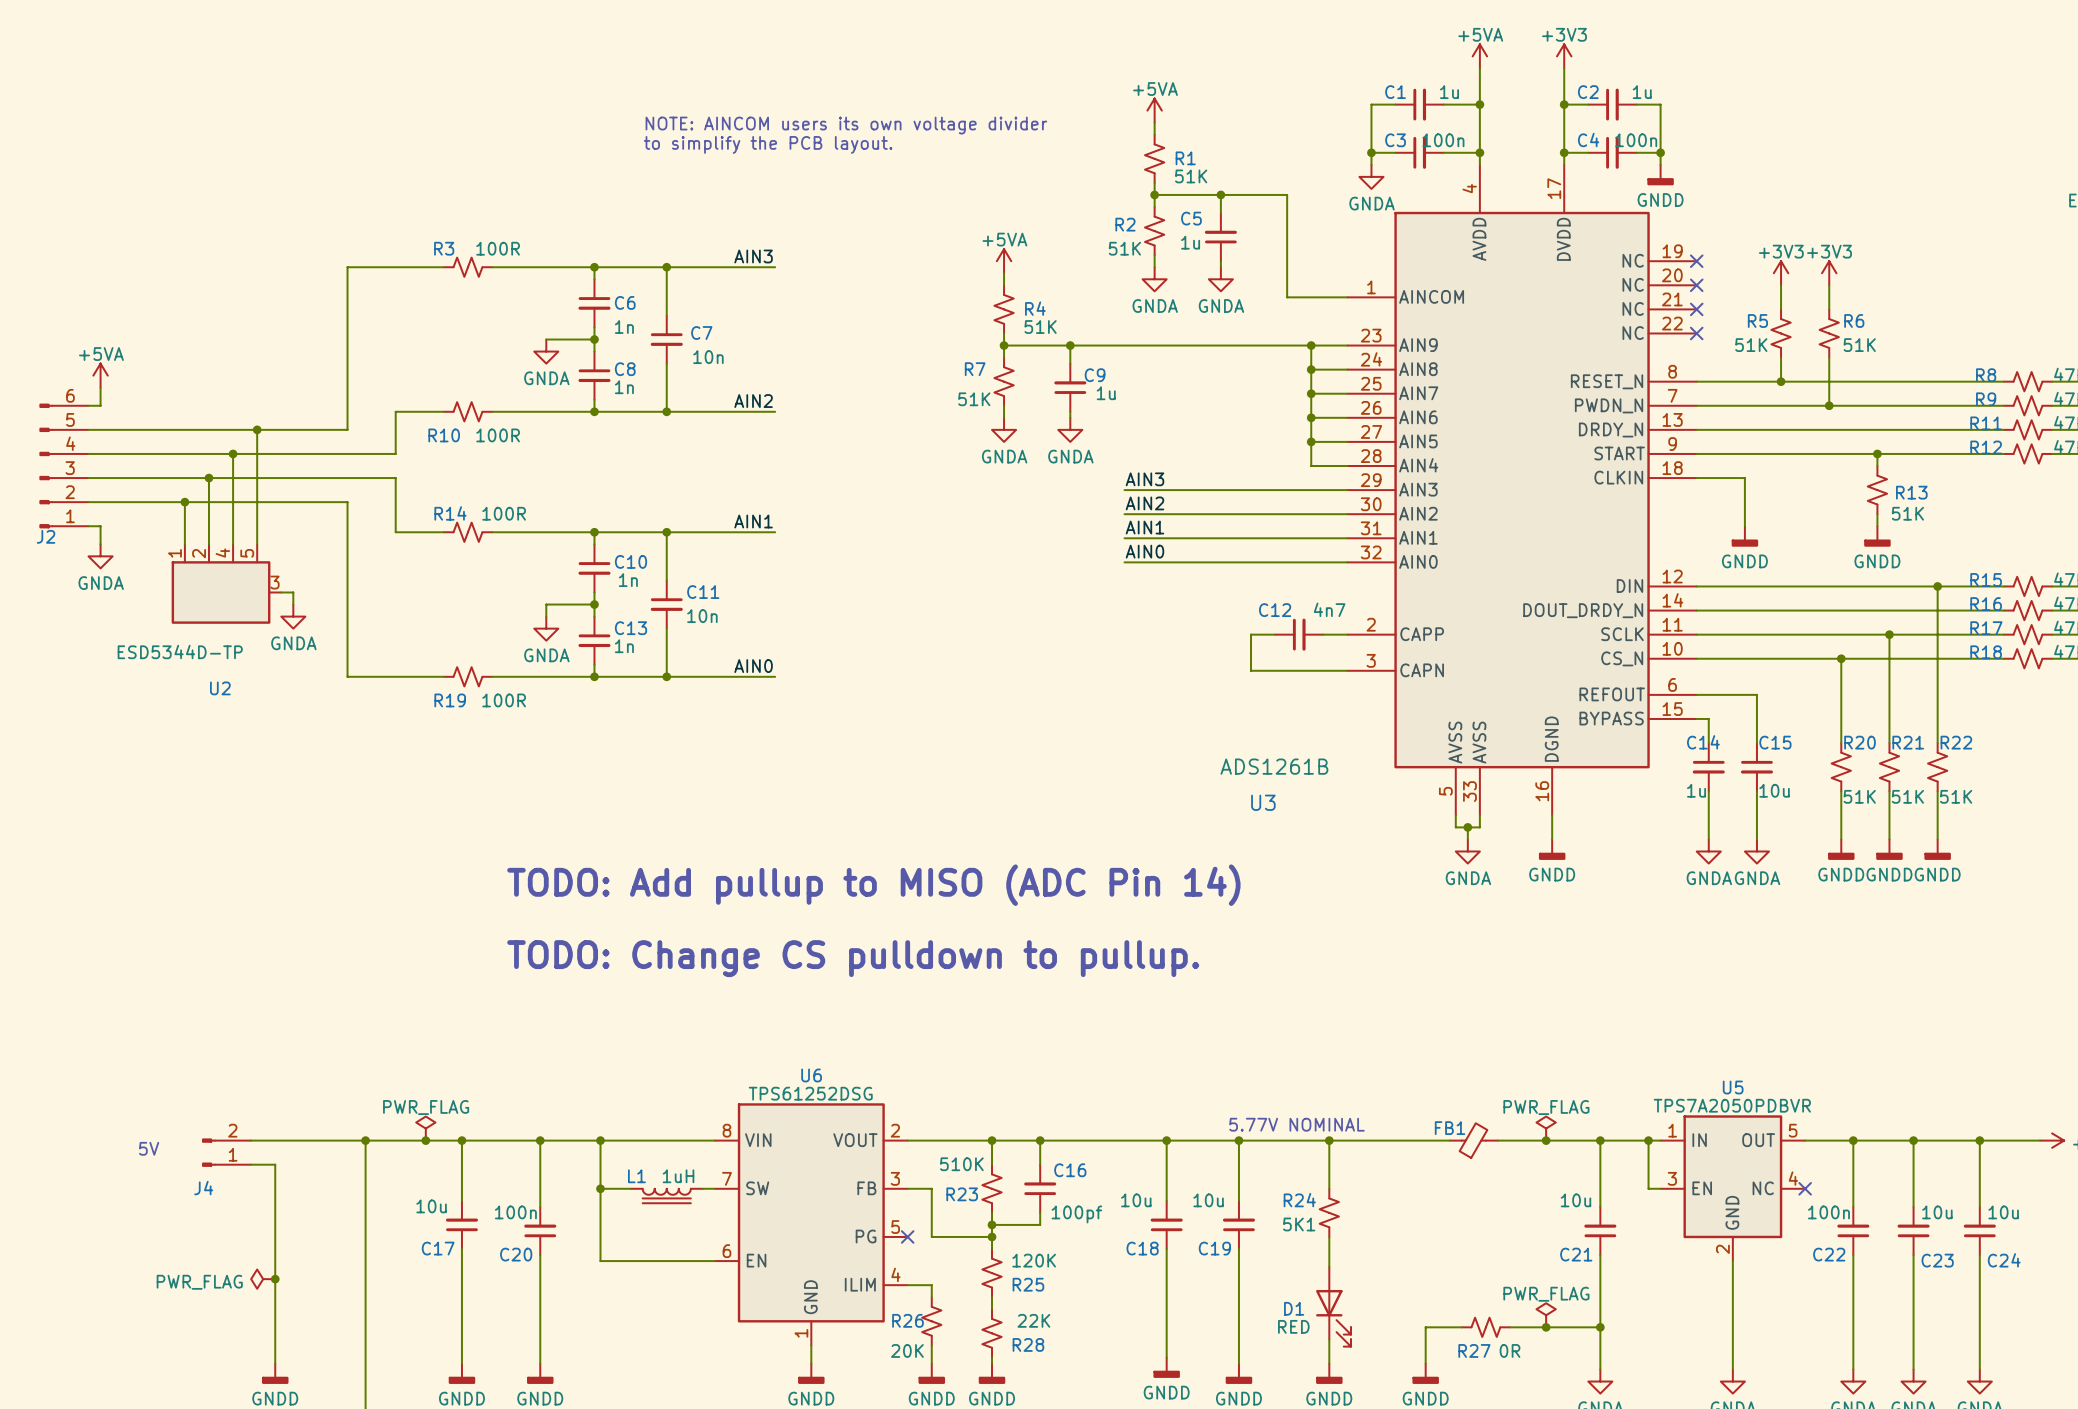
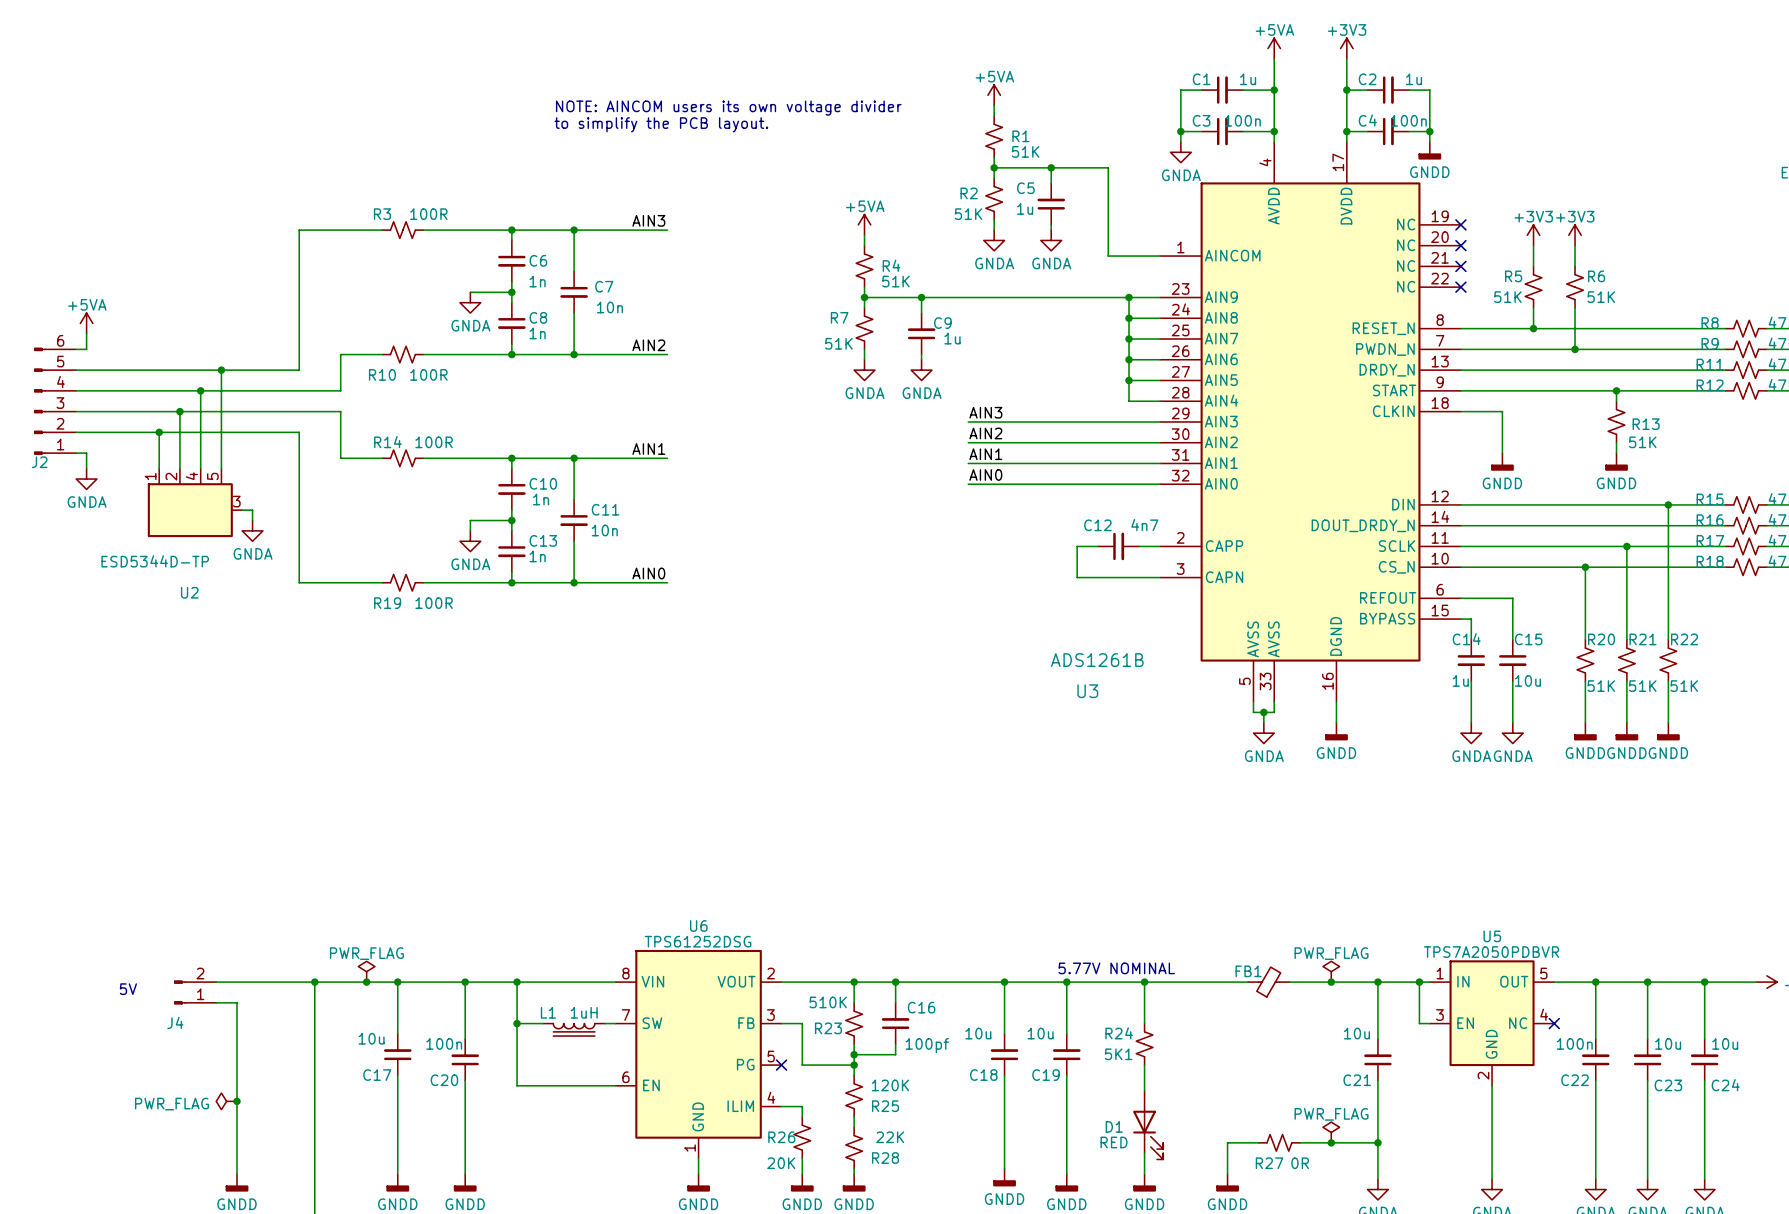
text: TODO: Add pullup to MISO (ADC Pin 14) (873, 885) -> none
text: TODO: Change CS pulldown to pullup. (853, 958) -> none

